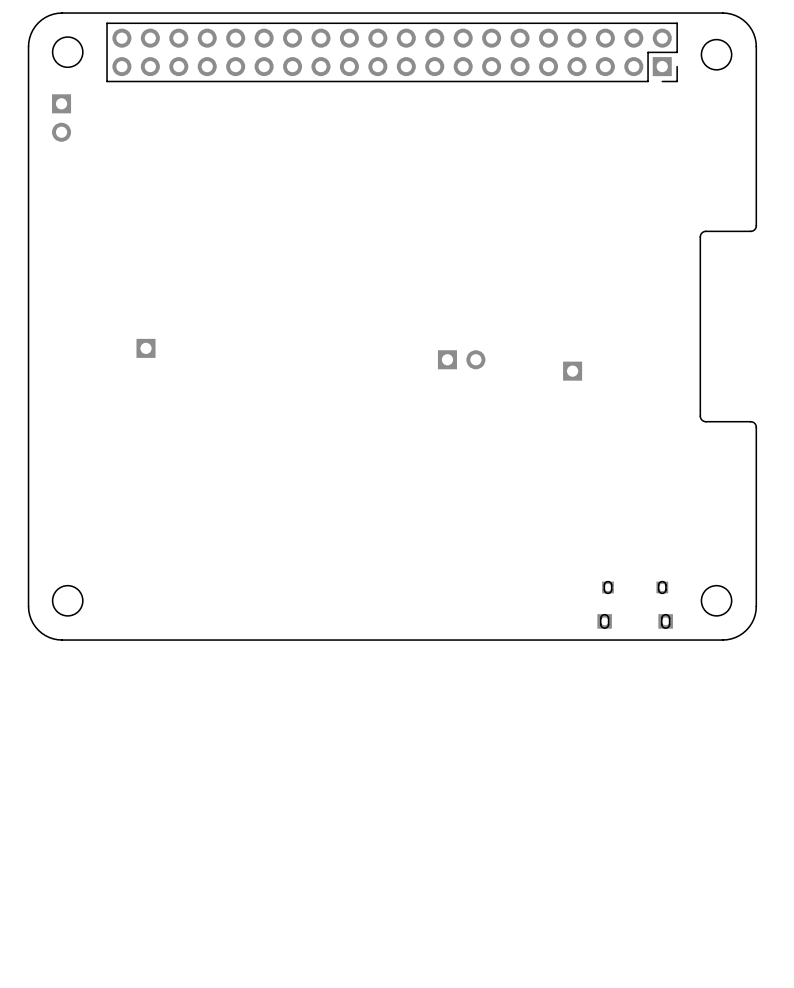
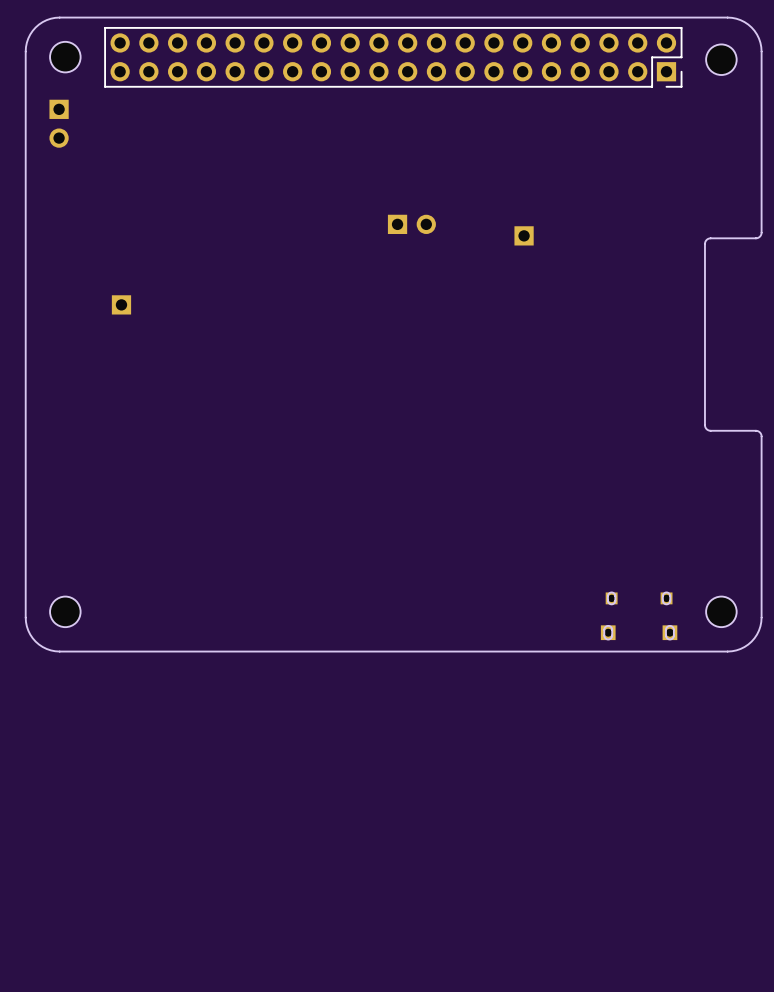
part position: (146, 348) -> (121, 304)
part position: (461, 359) -> (411, 224)
part position: (572, 371) -> (524, 235)

